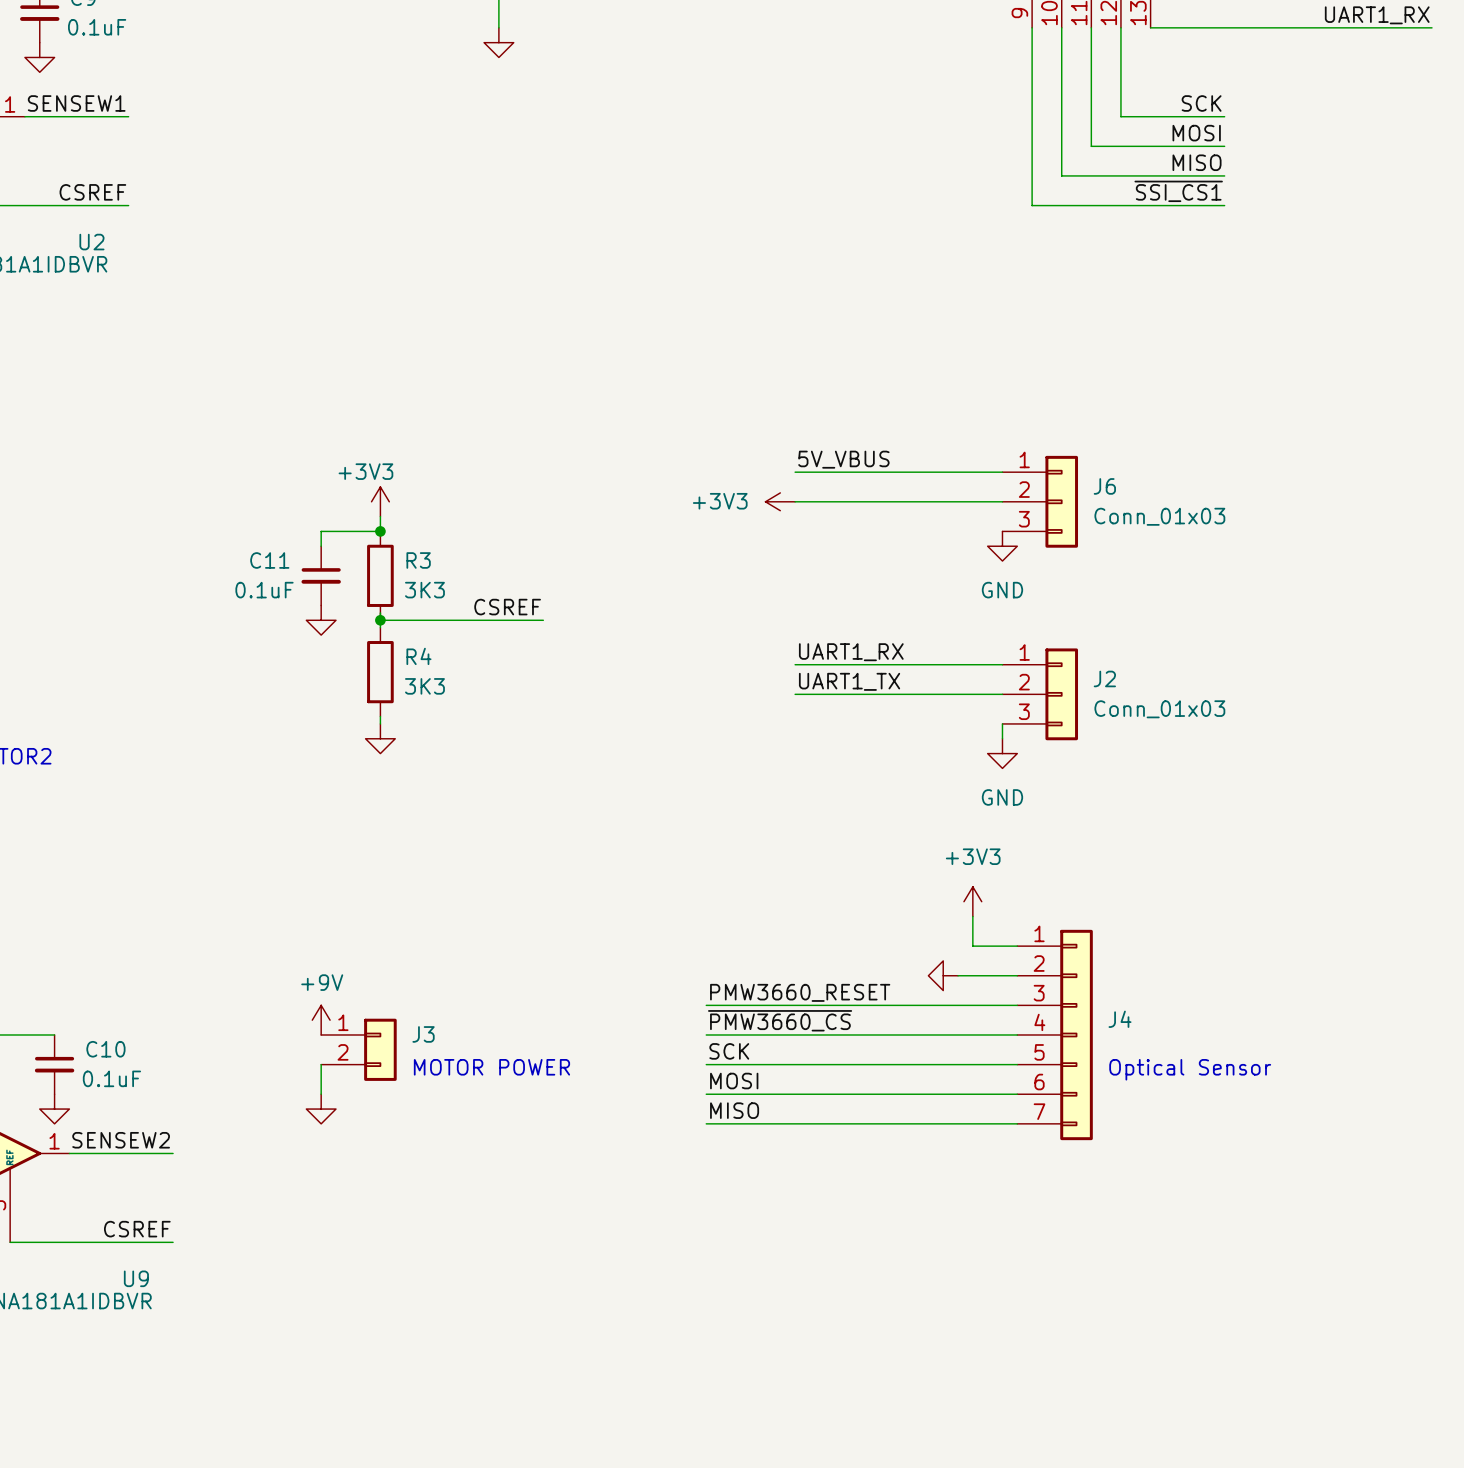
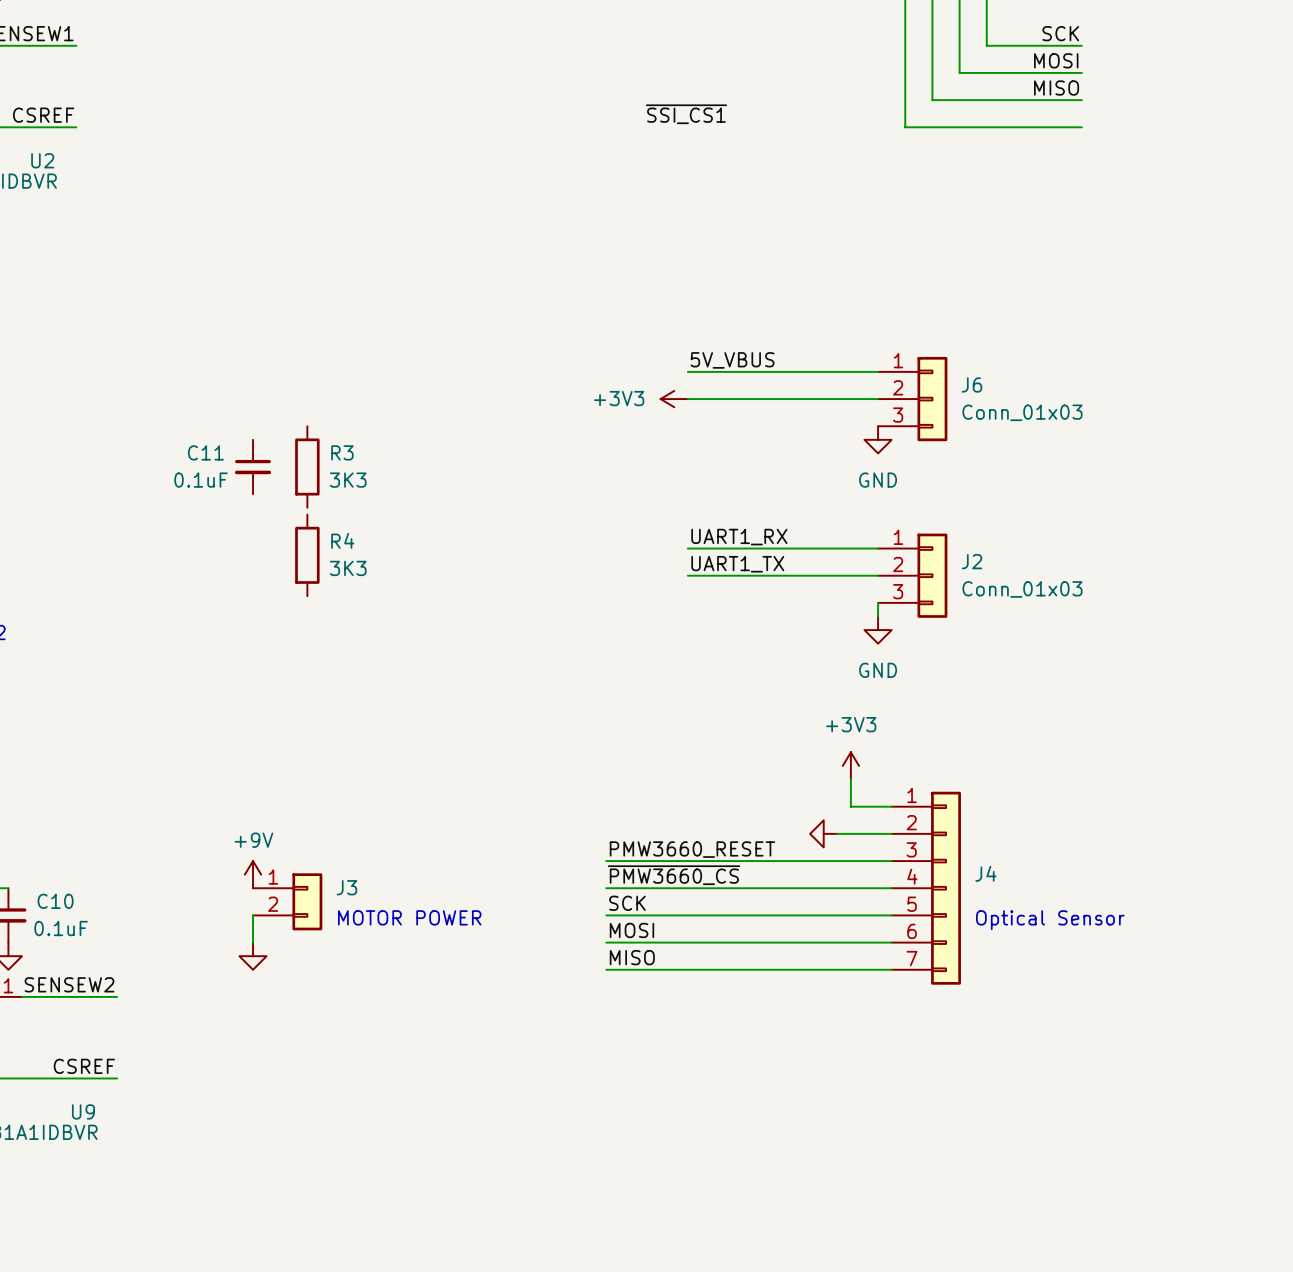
label: none -> ~{SSI_CS1} (686, 114)
label: ~{SSI_CS1} (1178, 191) -> none
power symbol: +3V3 (380, 501) -> none
wire: (380, 516) (380, 531) (321, 531) (321, 546) -> none
junction: (380, 531) -> none
label: CSREF (507, 607) -> none
power symbol: (321, 620) -> none
wire: (380, 620) (543, 620) -> none
junction: (380, 620) -> none
wire: (380, 716) (380, 723) -> none
power symbol: (380, 738) -> none

